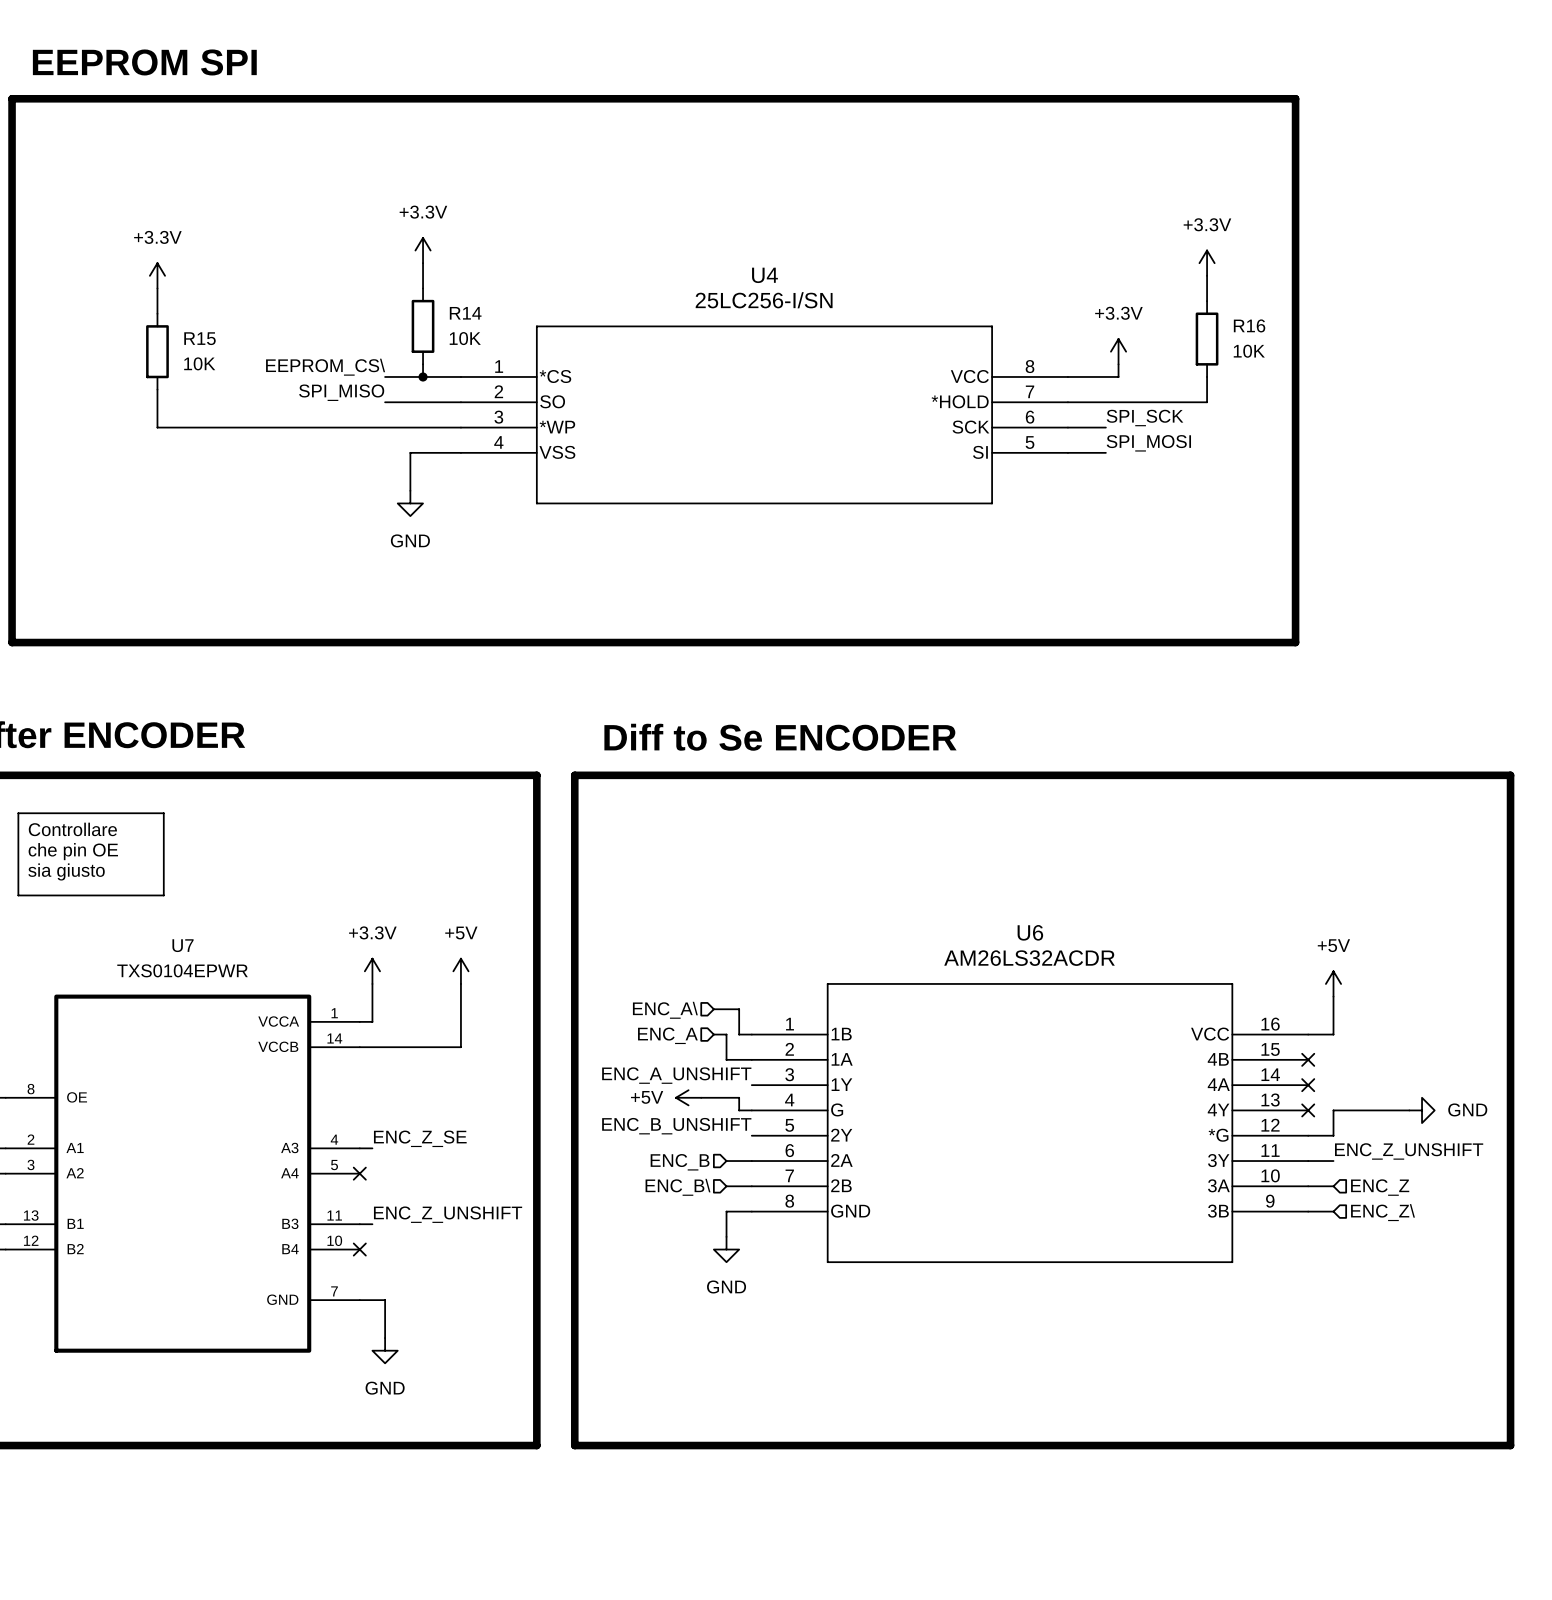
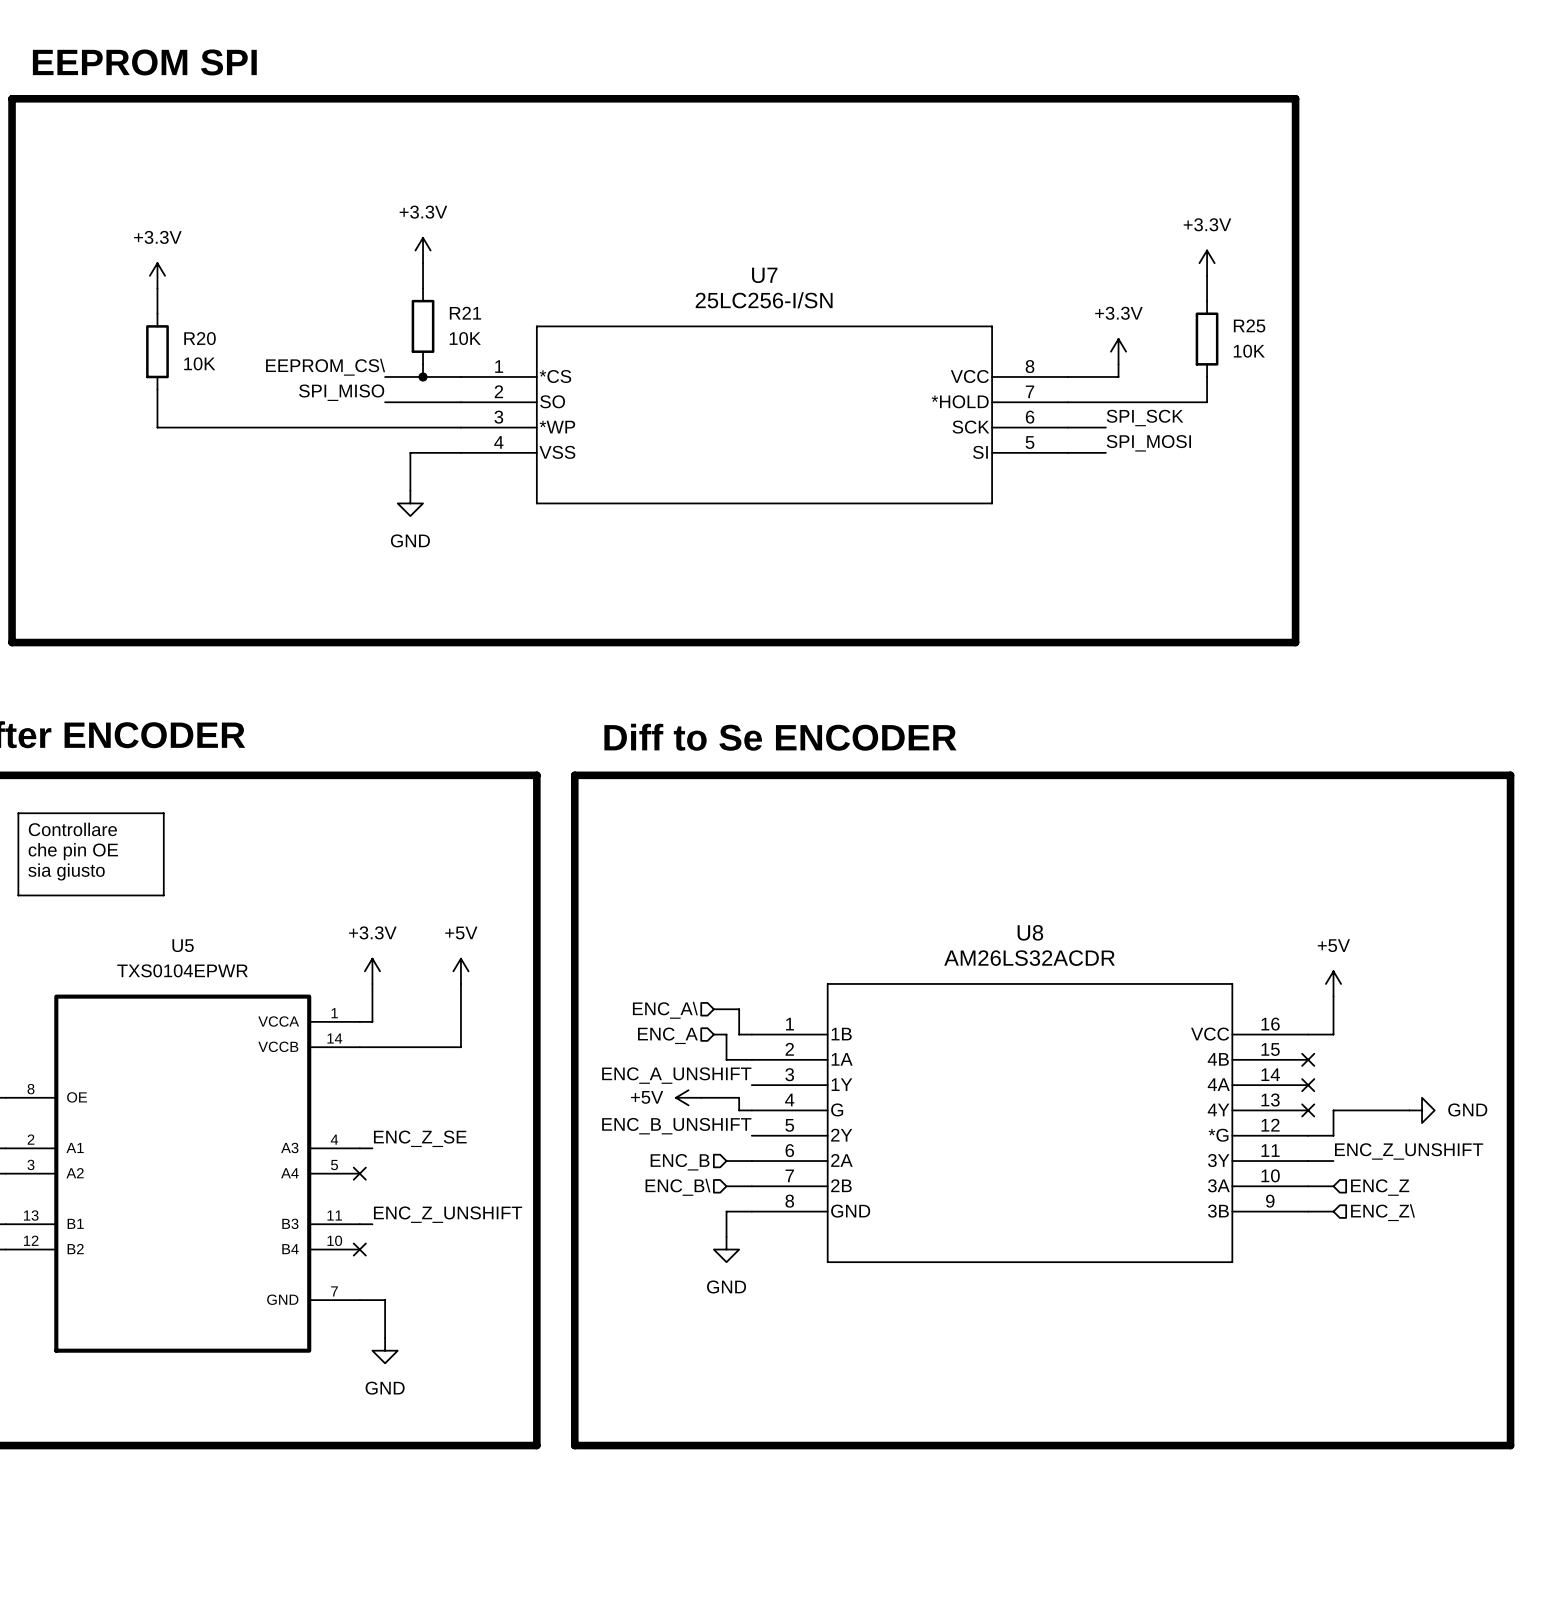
U4 name: U4 (764, 275) -> U7 (764, 275)
R14 name: R14 (465, 313) -> R21 (465, 313)
R16 name: R16 (1249, 325) -> R25 (1249, 325)
R15 name: R15 (199, 338) -> R20 (200, 338)
U6 name: U6 (1030, 932) -> U8 (1030, 932)
U7 name: U7 (183, 945) -> U5 (183, 945)

